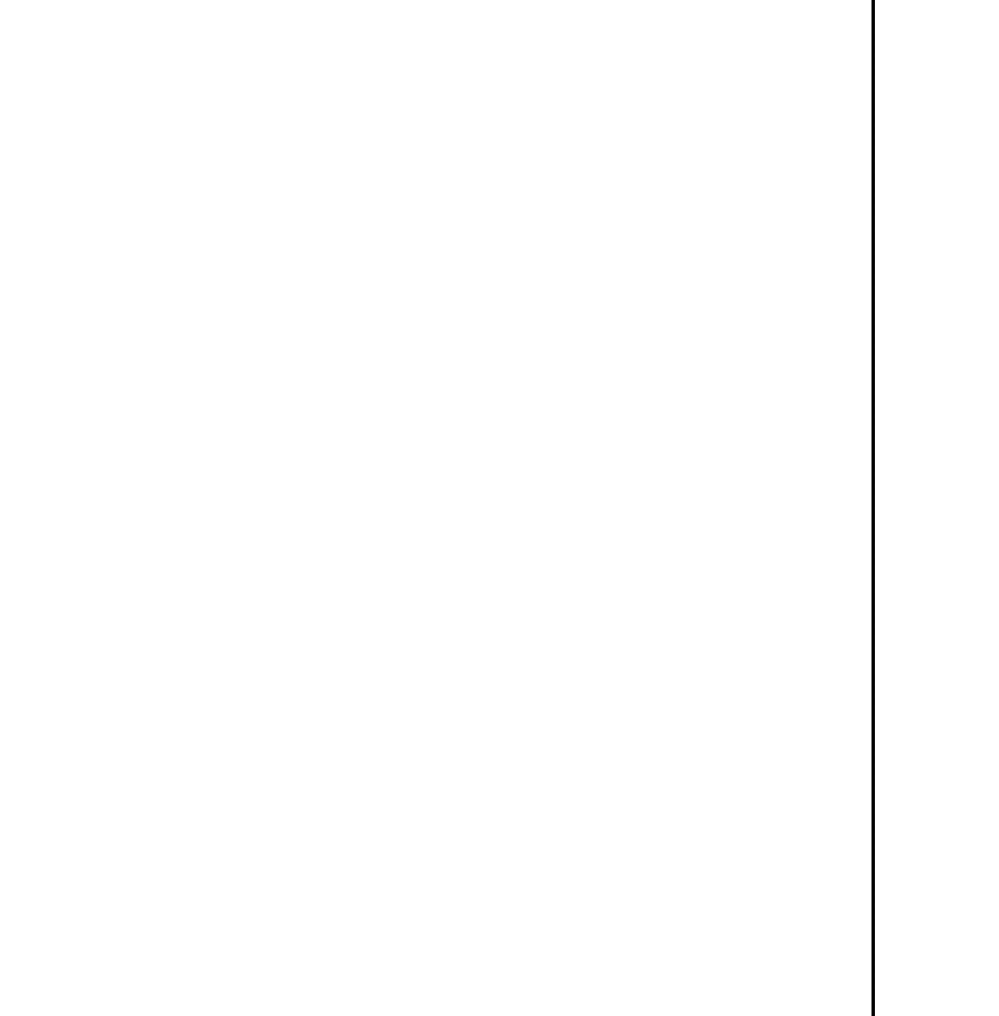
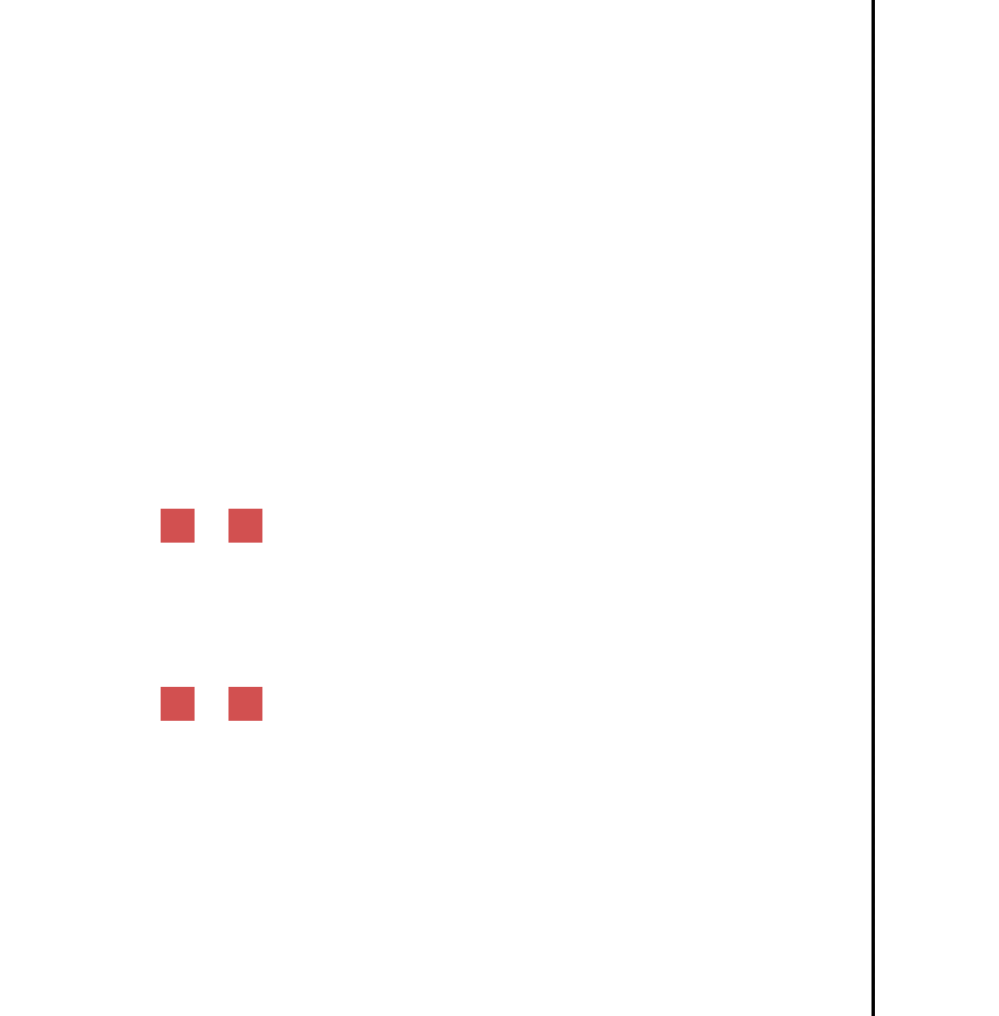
part: none -> (211, 525)
part: none -> (211, 703)

